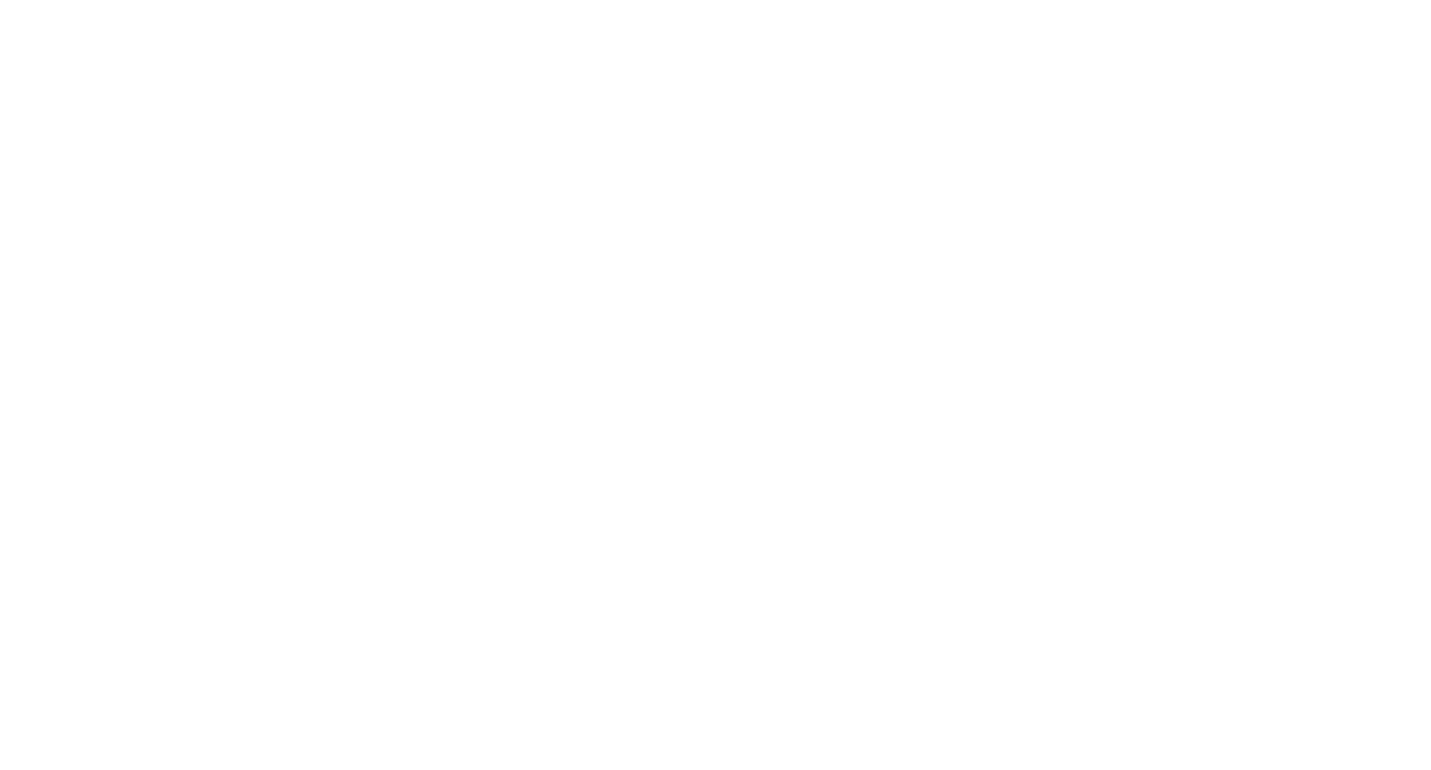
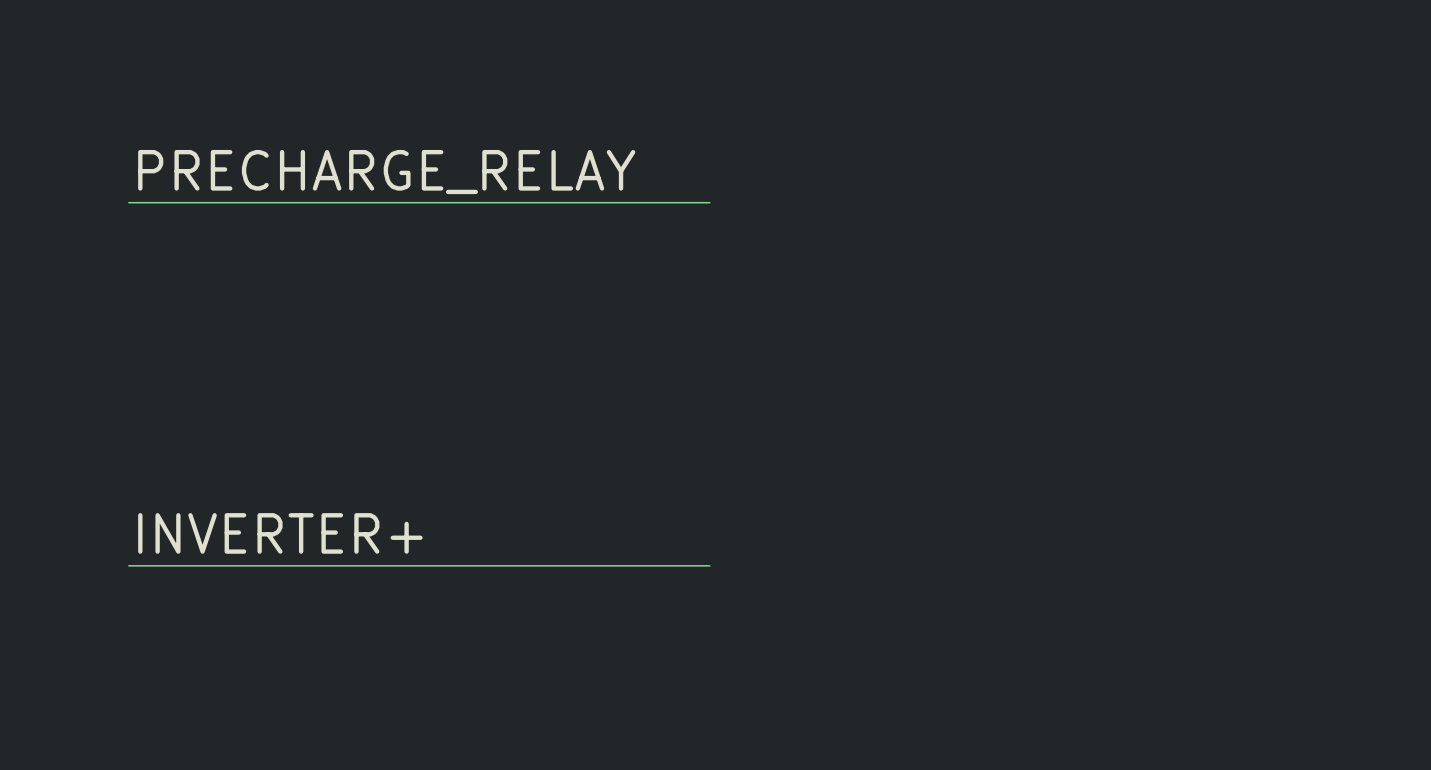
label: none -> PRECHARGE_RELAY (386, 172)
wire: none -> (128, 202) (709, 202)
label: none -> INVERTER+ (280, 533)
wire: none -> (128, 565) (709, 565)

